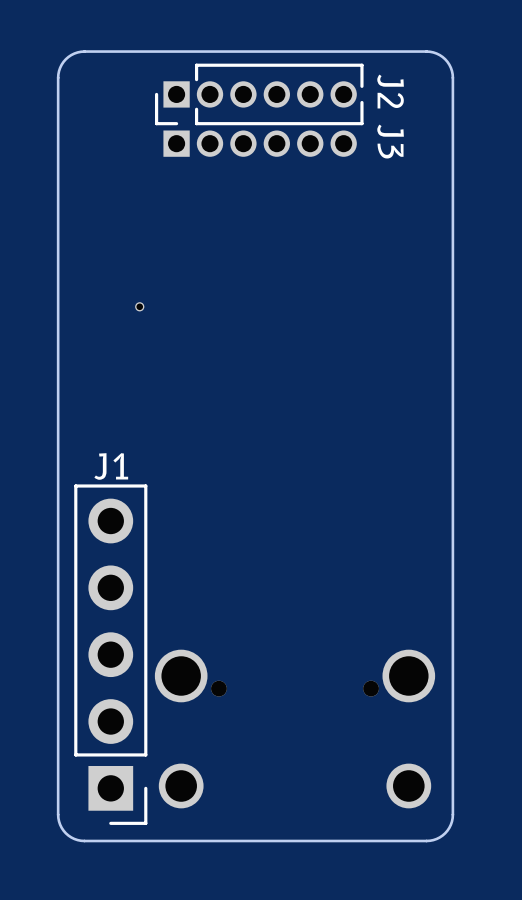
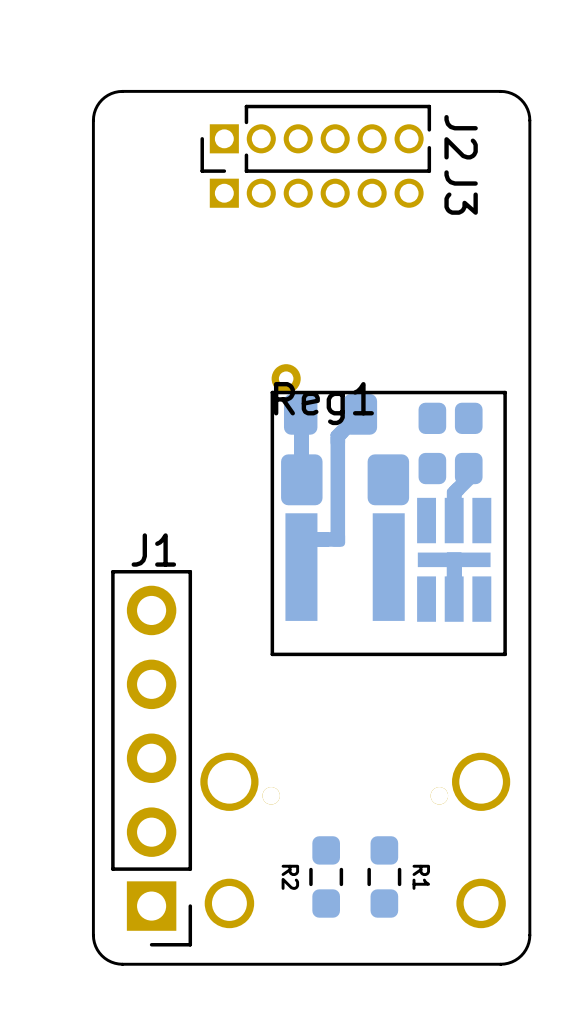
part: (139, 306) -> none
part: none -> (286, 378)
Reg1: none -> (388, 523)
R2: none -> (326, 876)
R1: none -> (384, 876)

